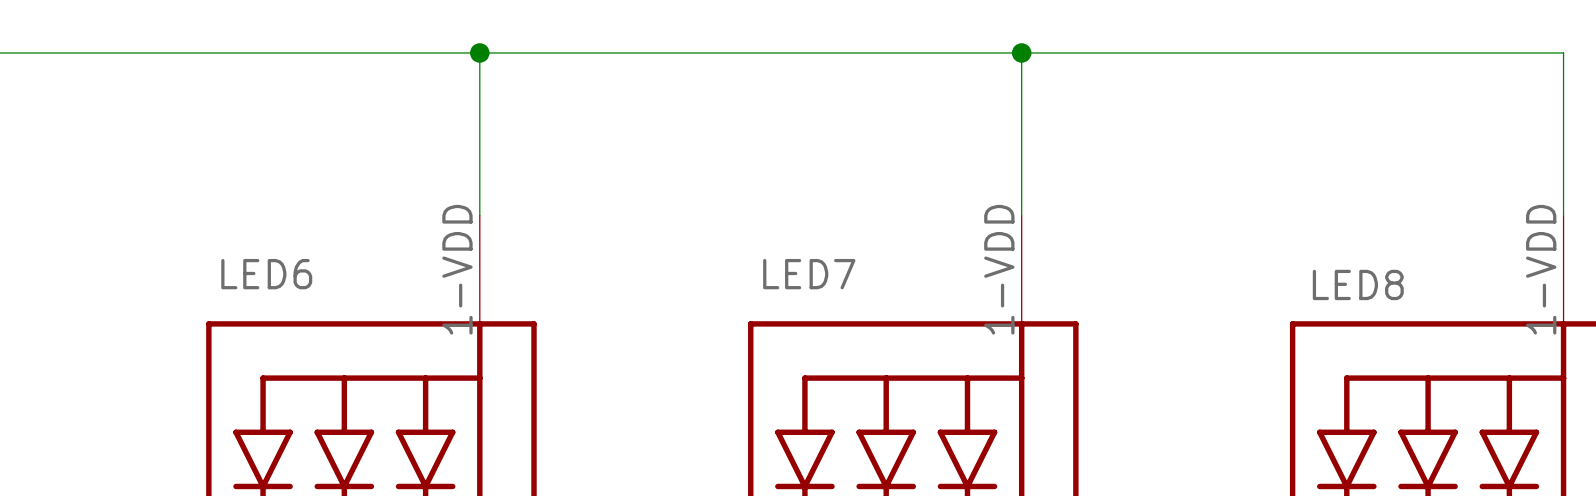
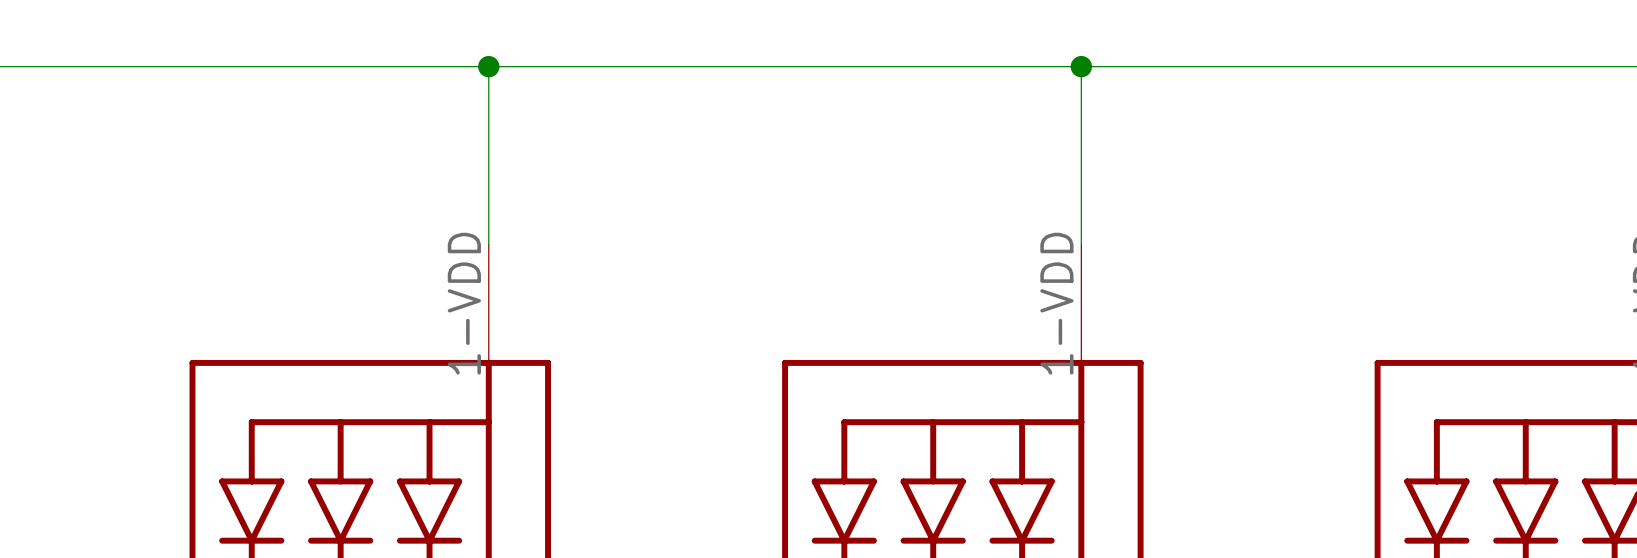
LED6 name: LED6 (266, 274) -> none
LED7 name: LED7 (809, 274) -> none
LED8 name: LED8 (1358, 284) -> none

